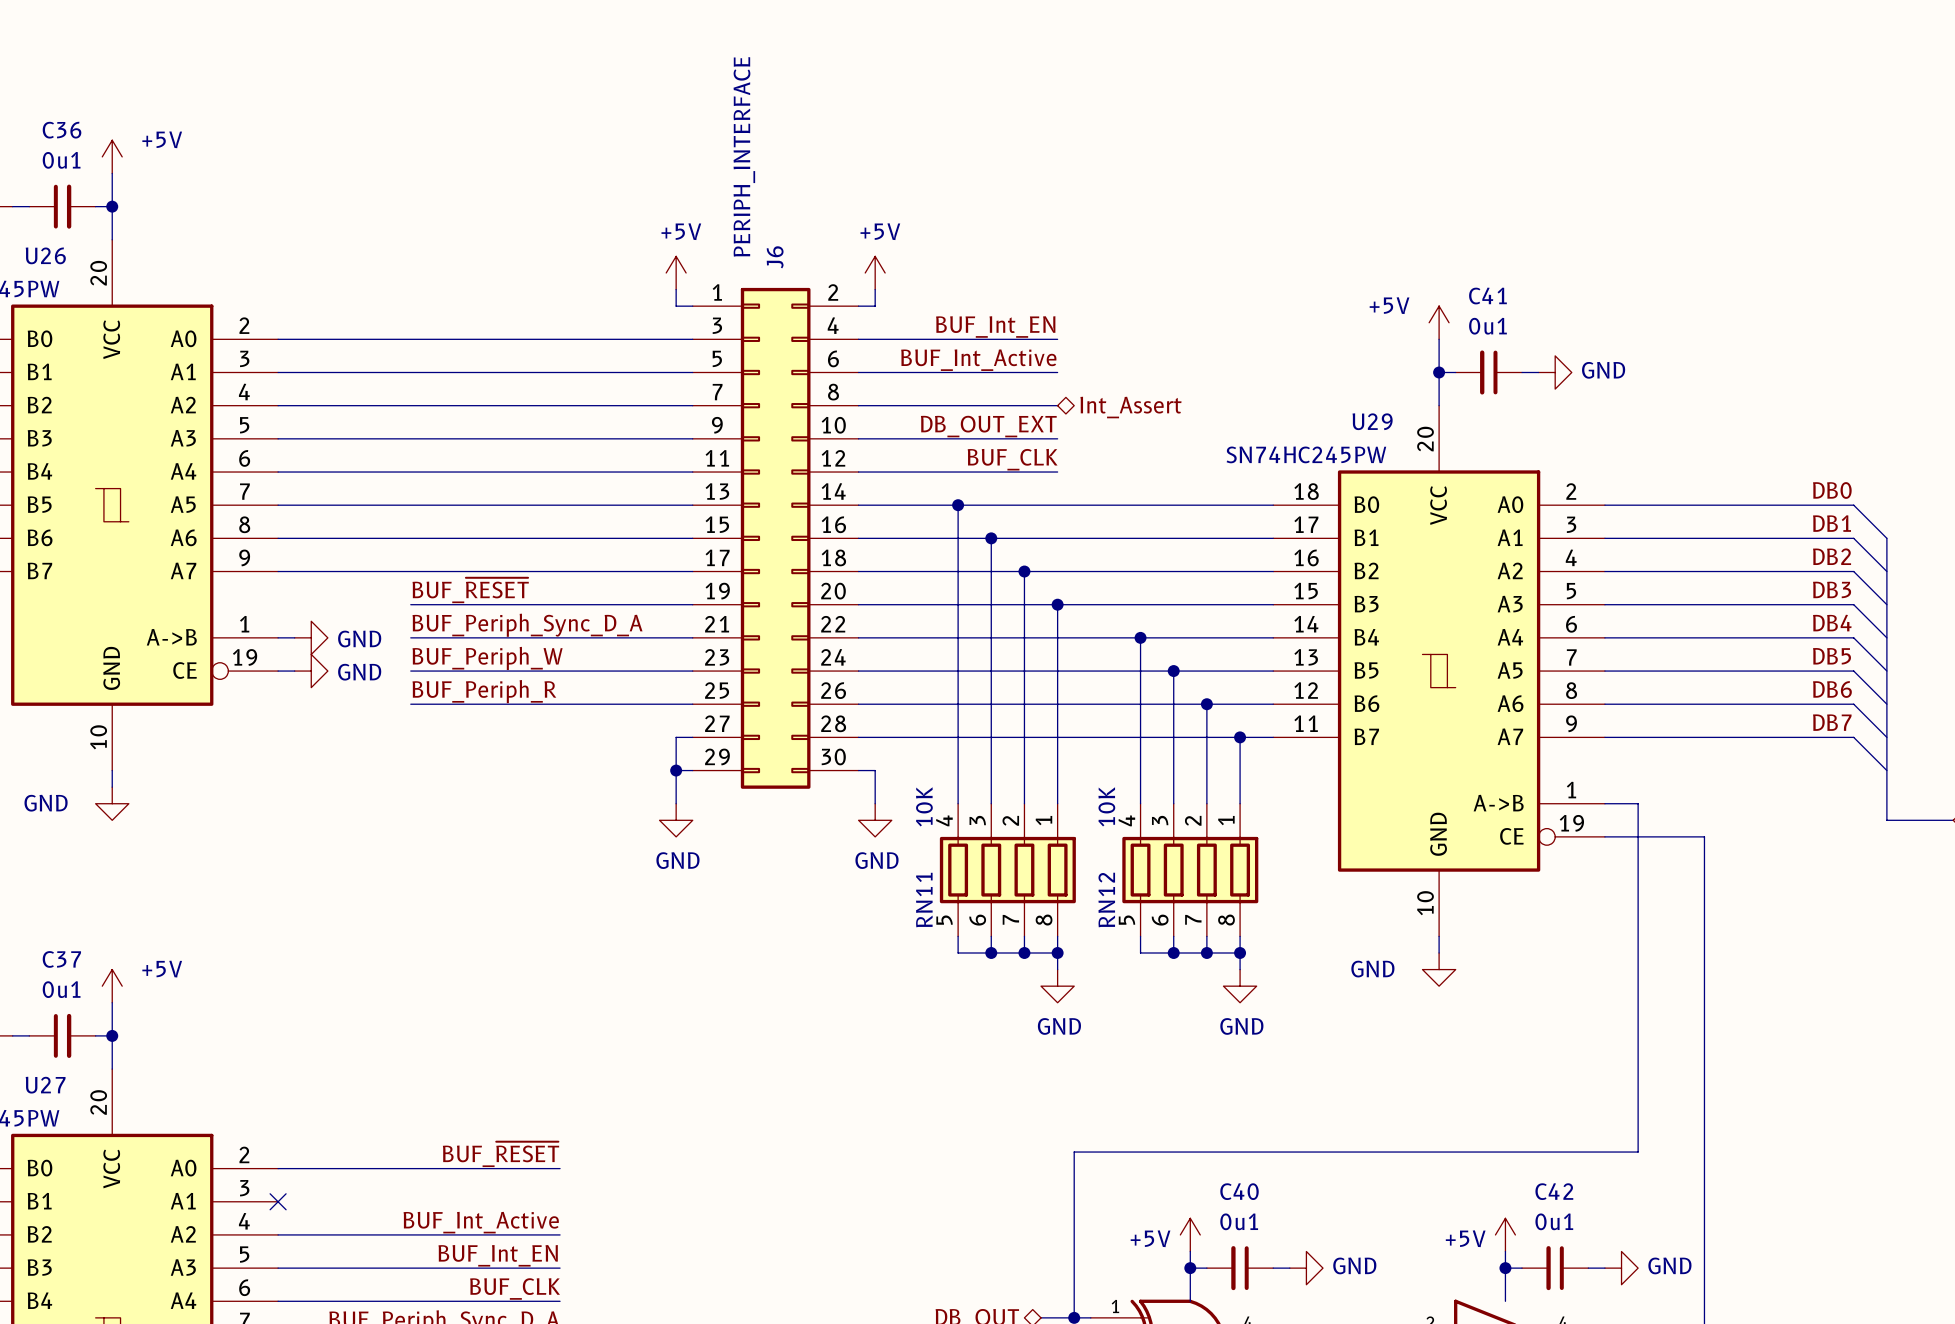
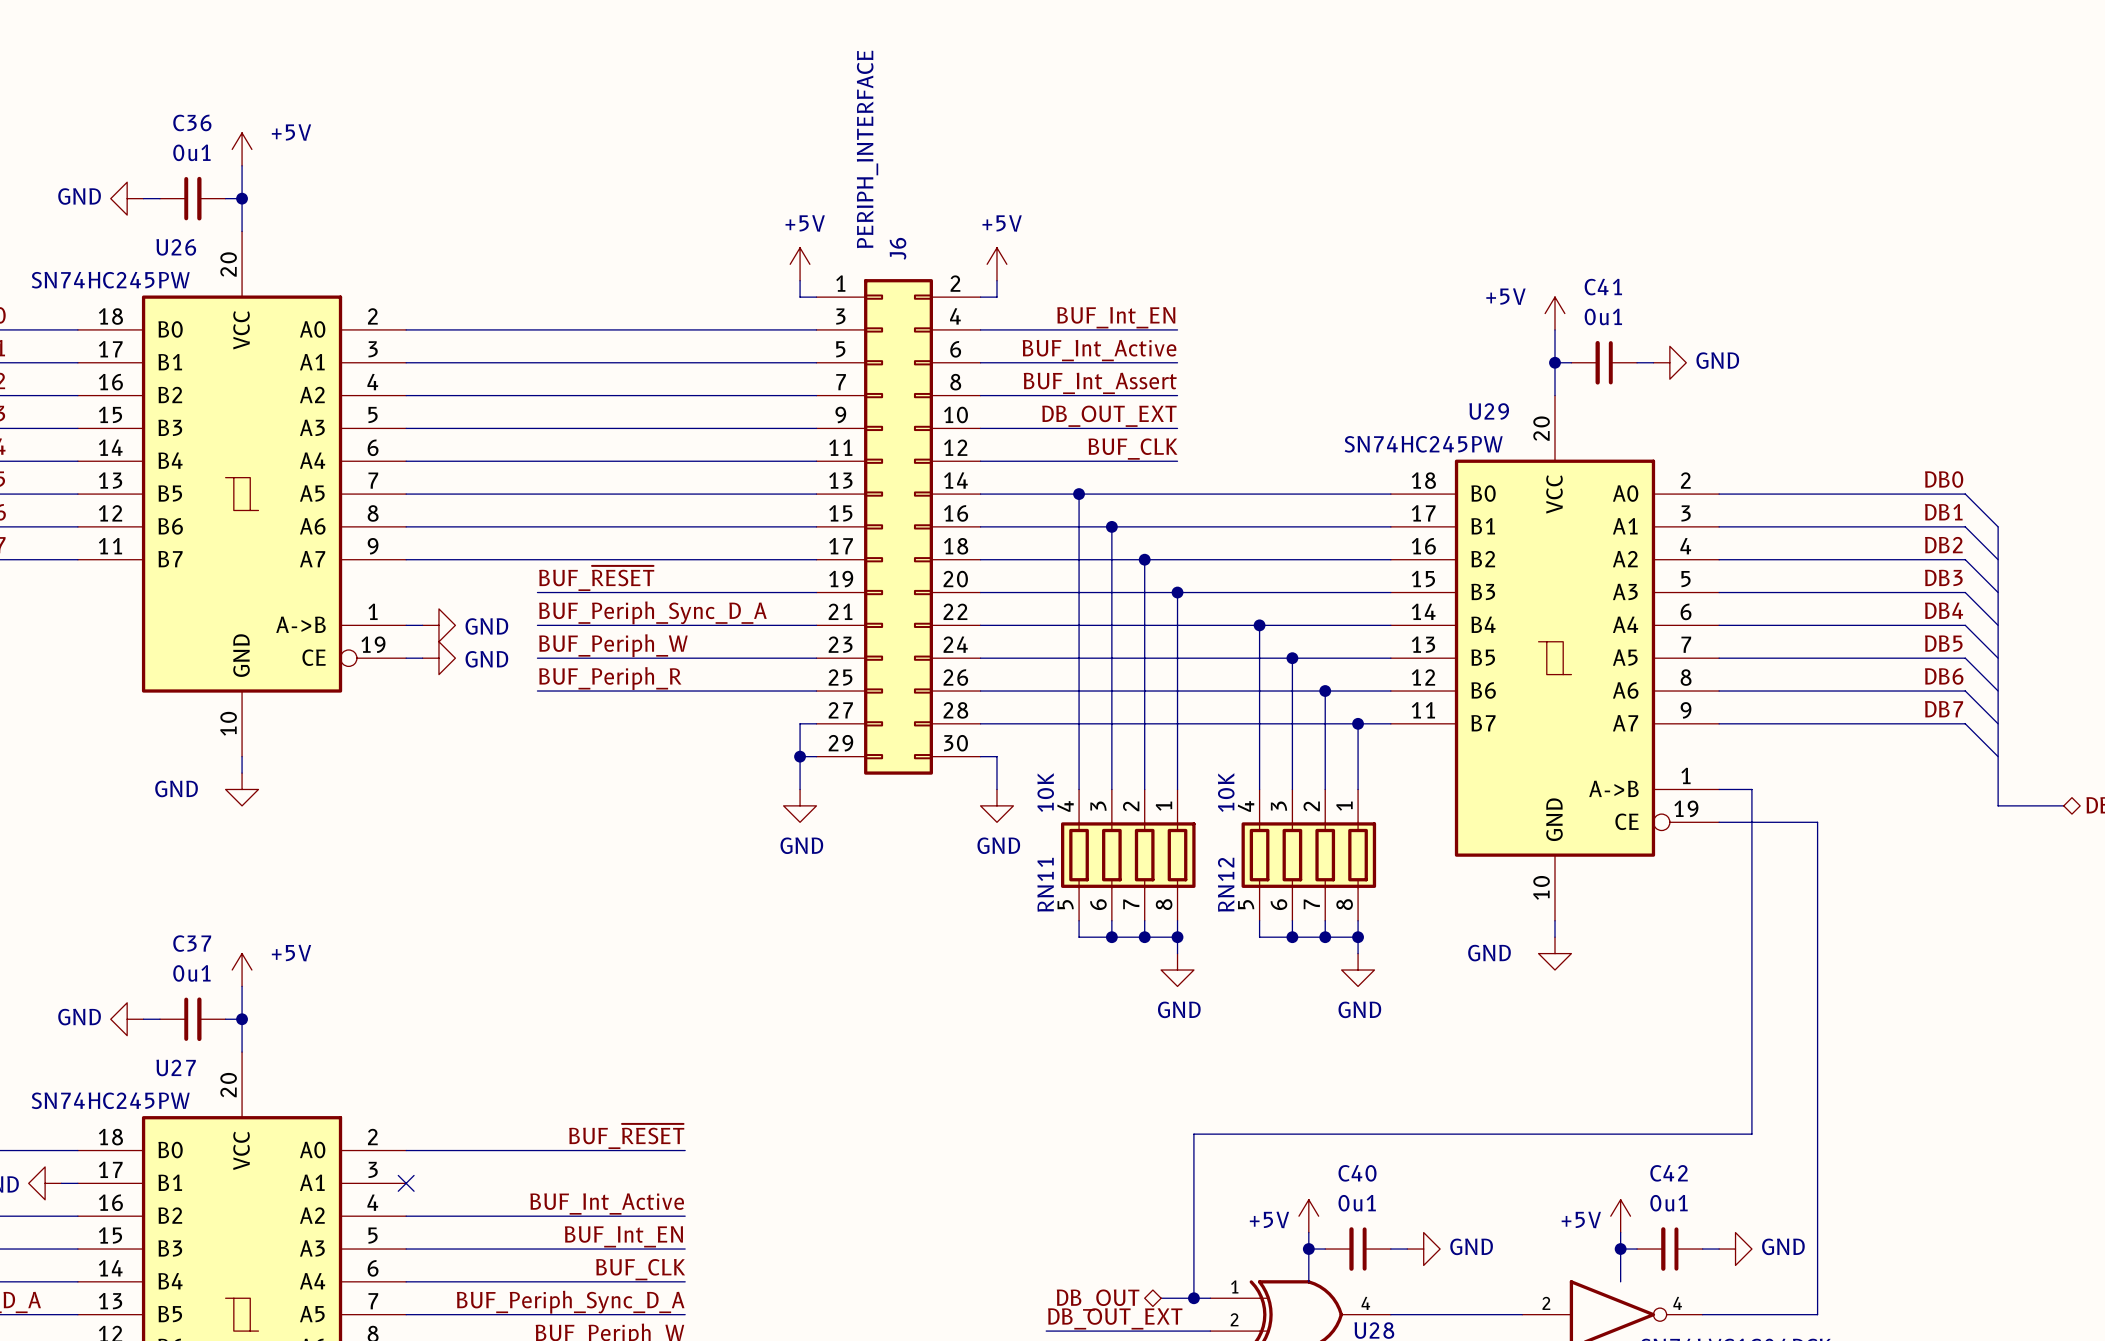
label: none -> BUF_Int_Assert (1100, 383)
hierarchical label: Int_Assert (1130, 407) -> none

